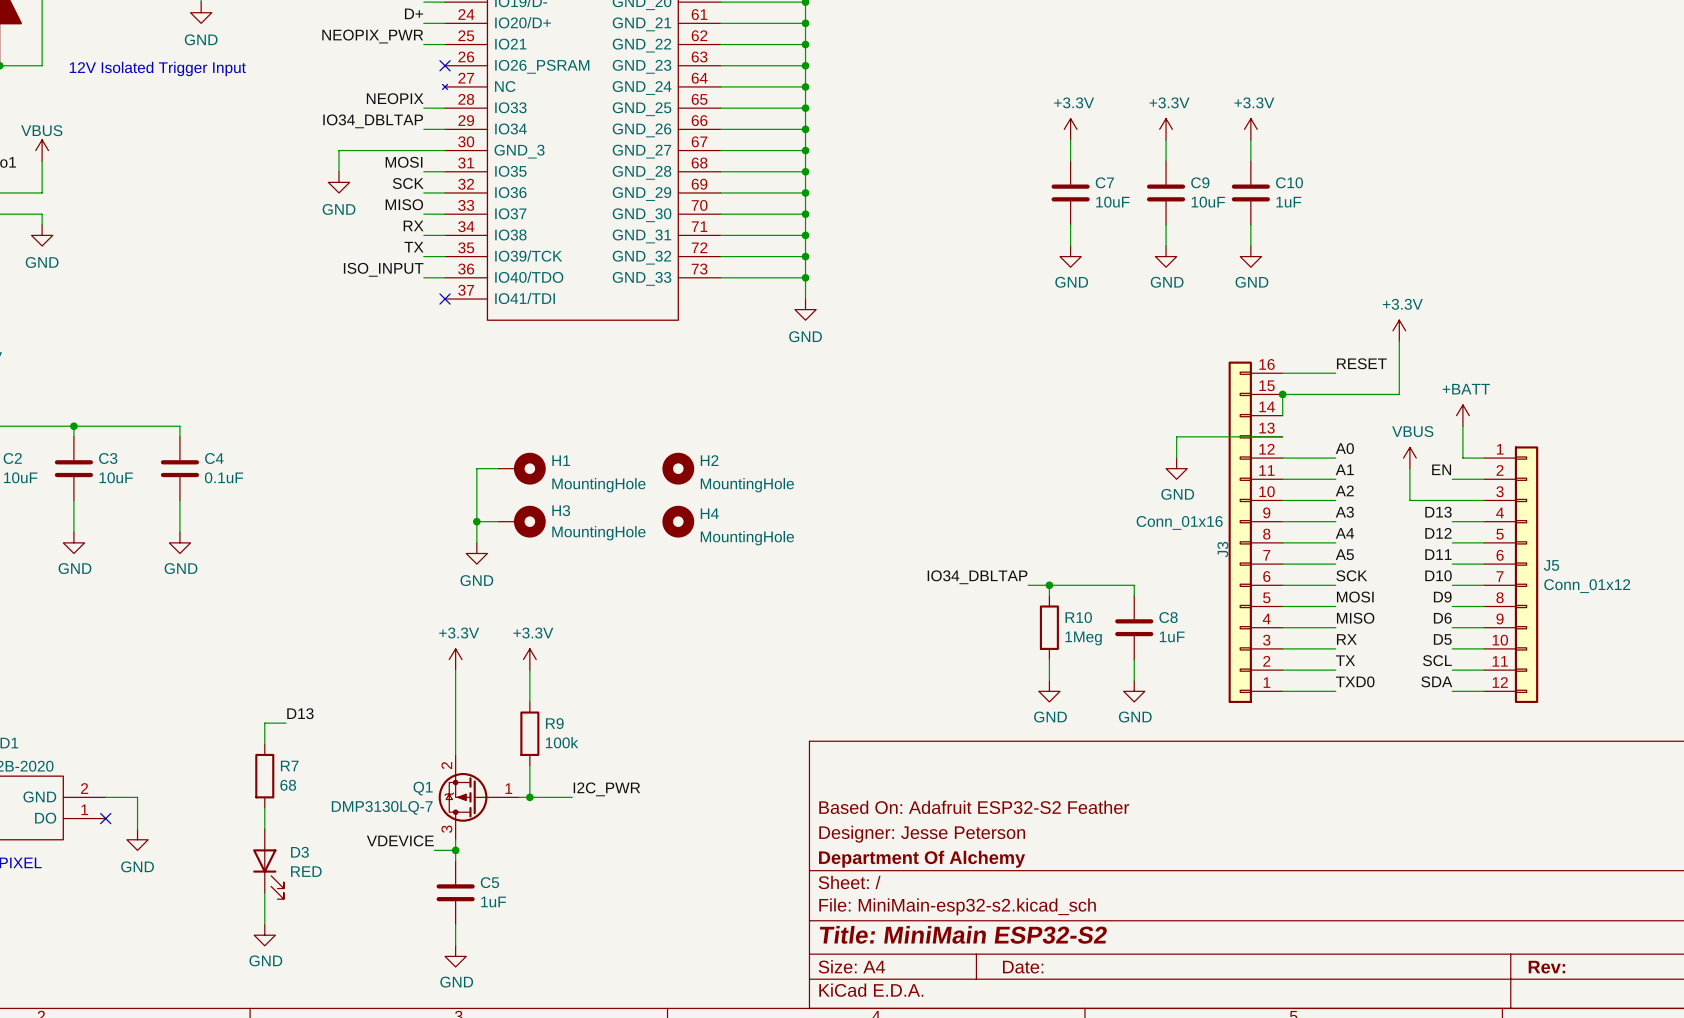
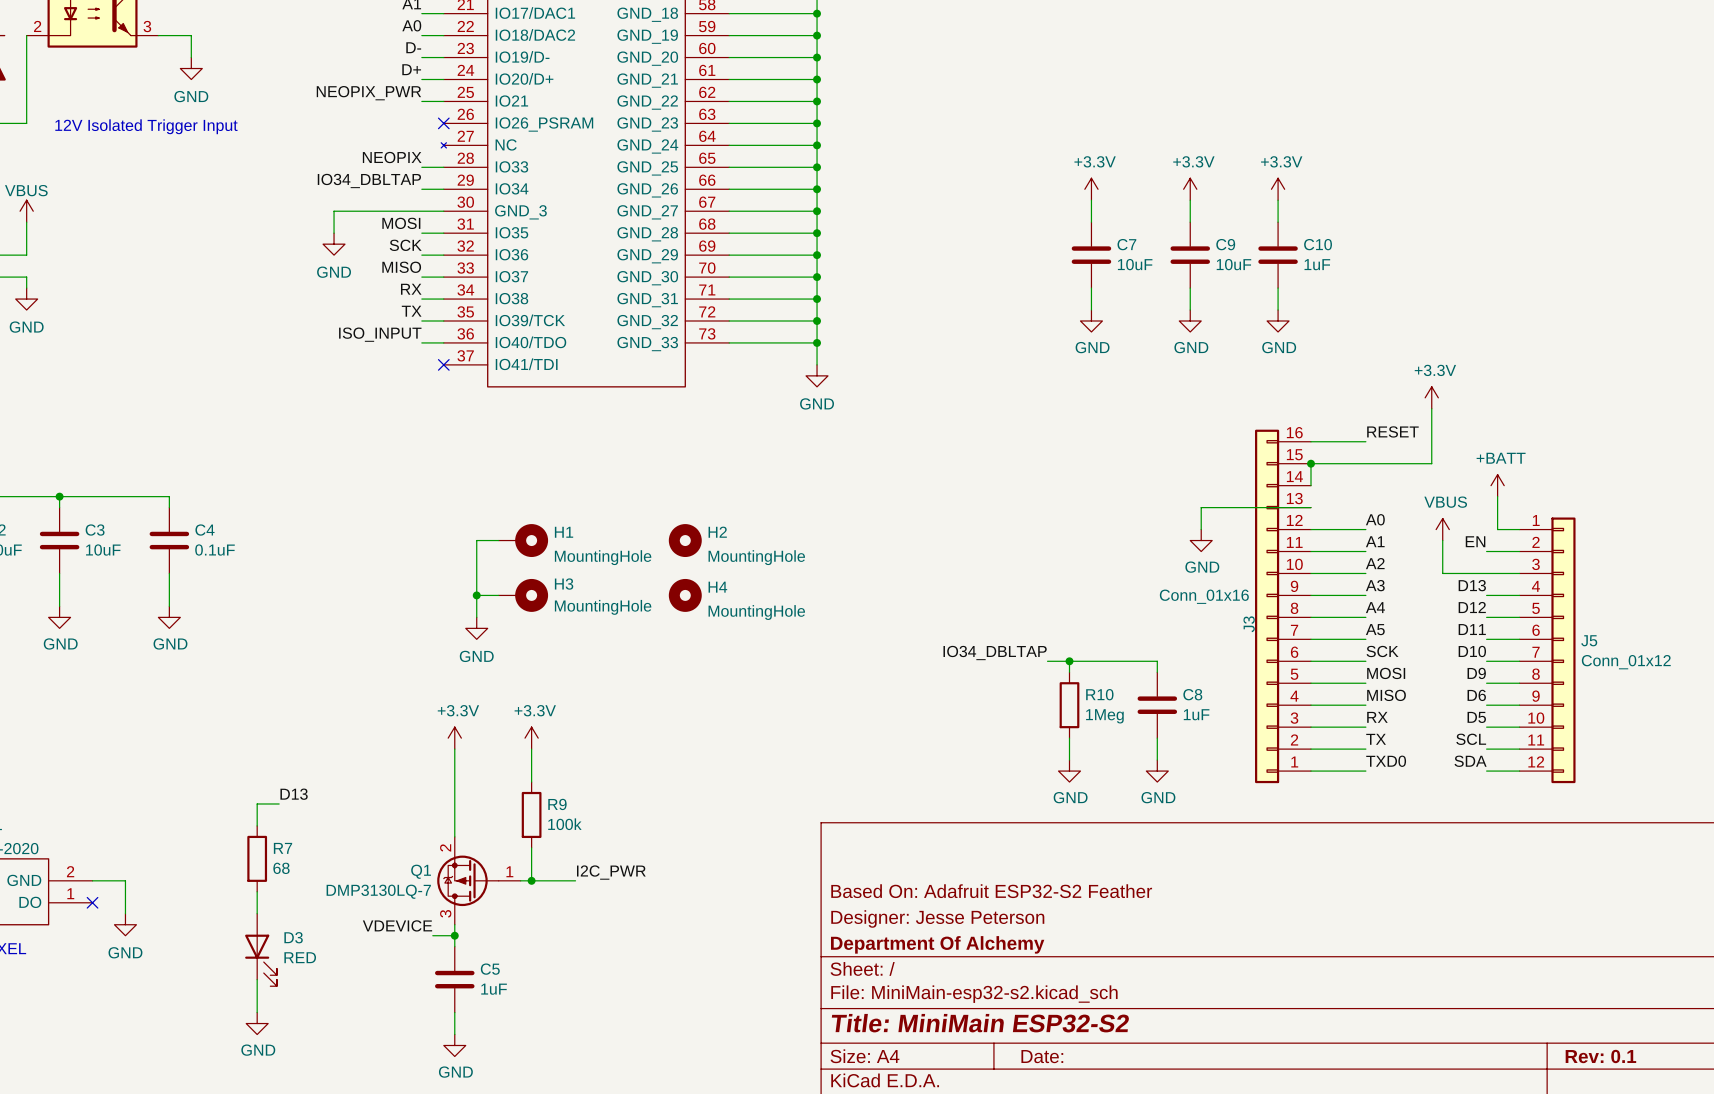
title block: Rev: (1546, 967) -> Rev: 0.1 (1600, 1056)

